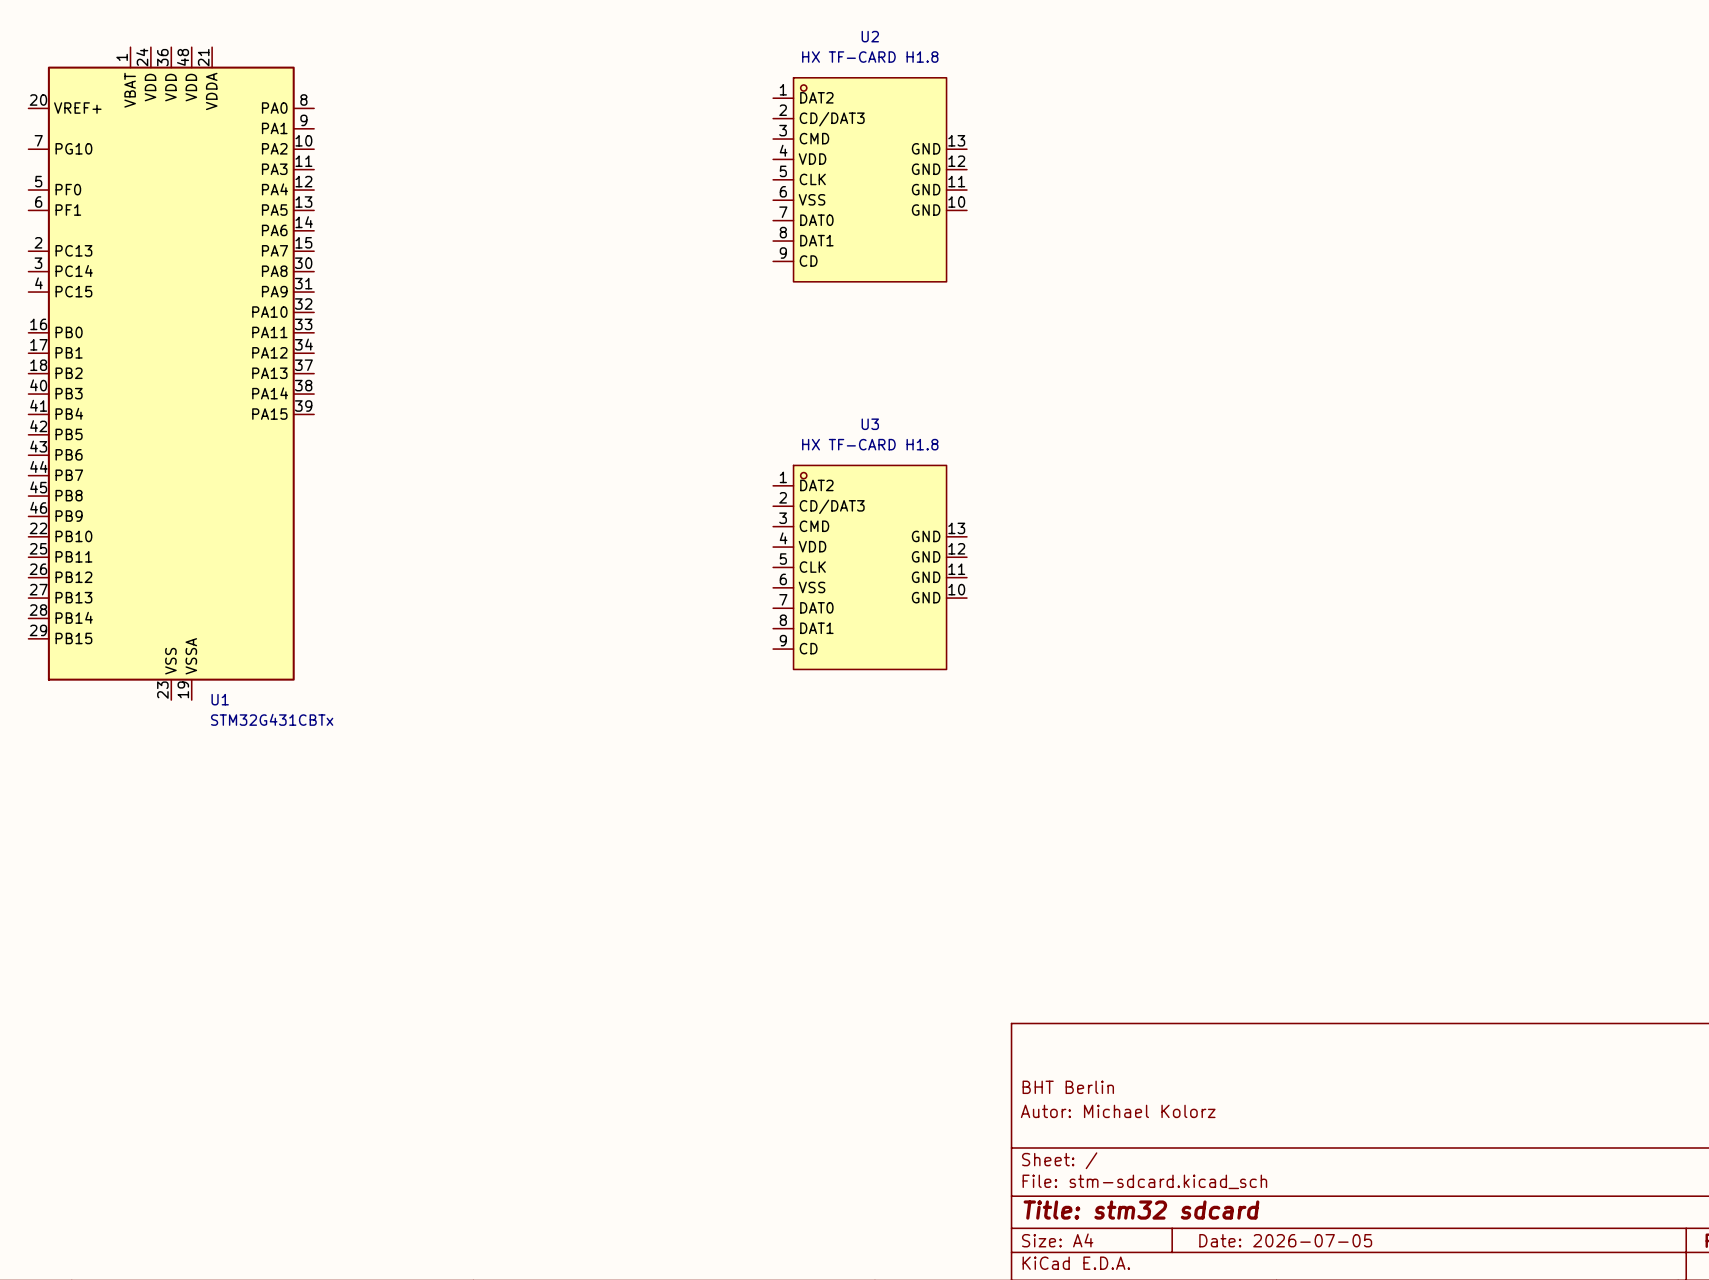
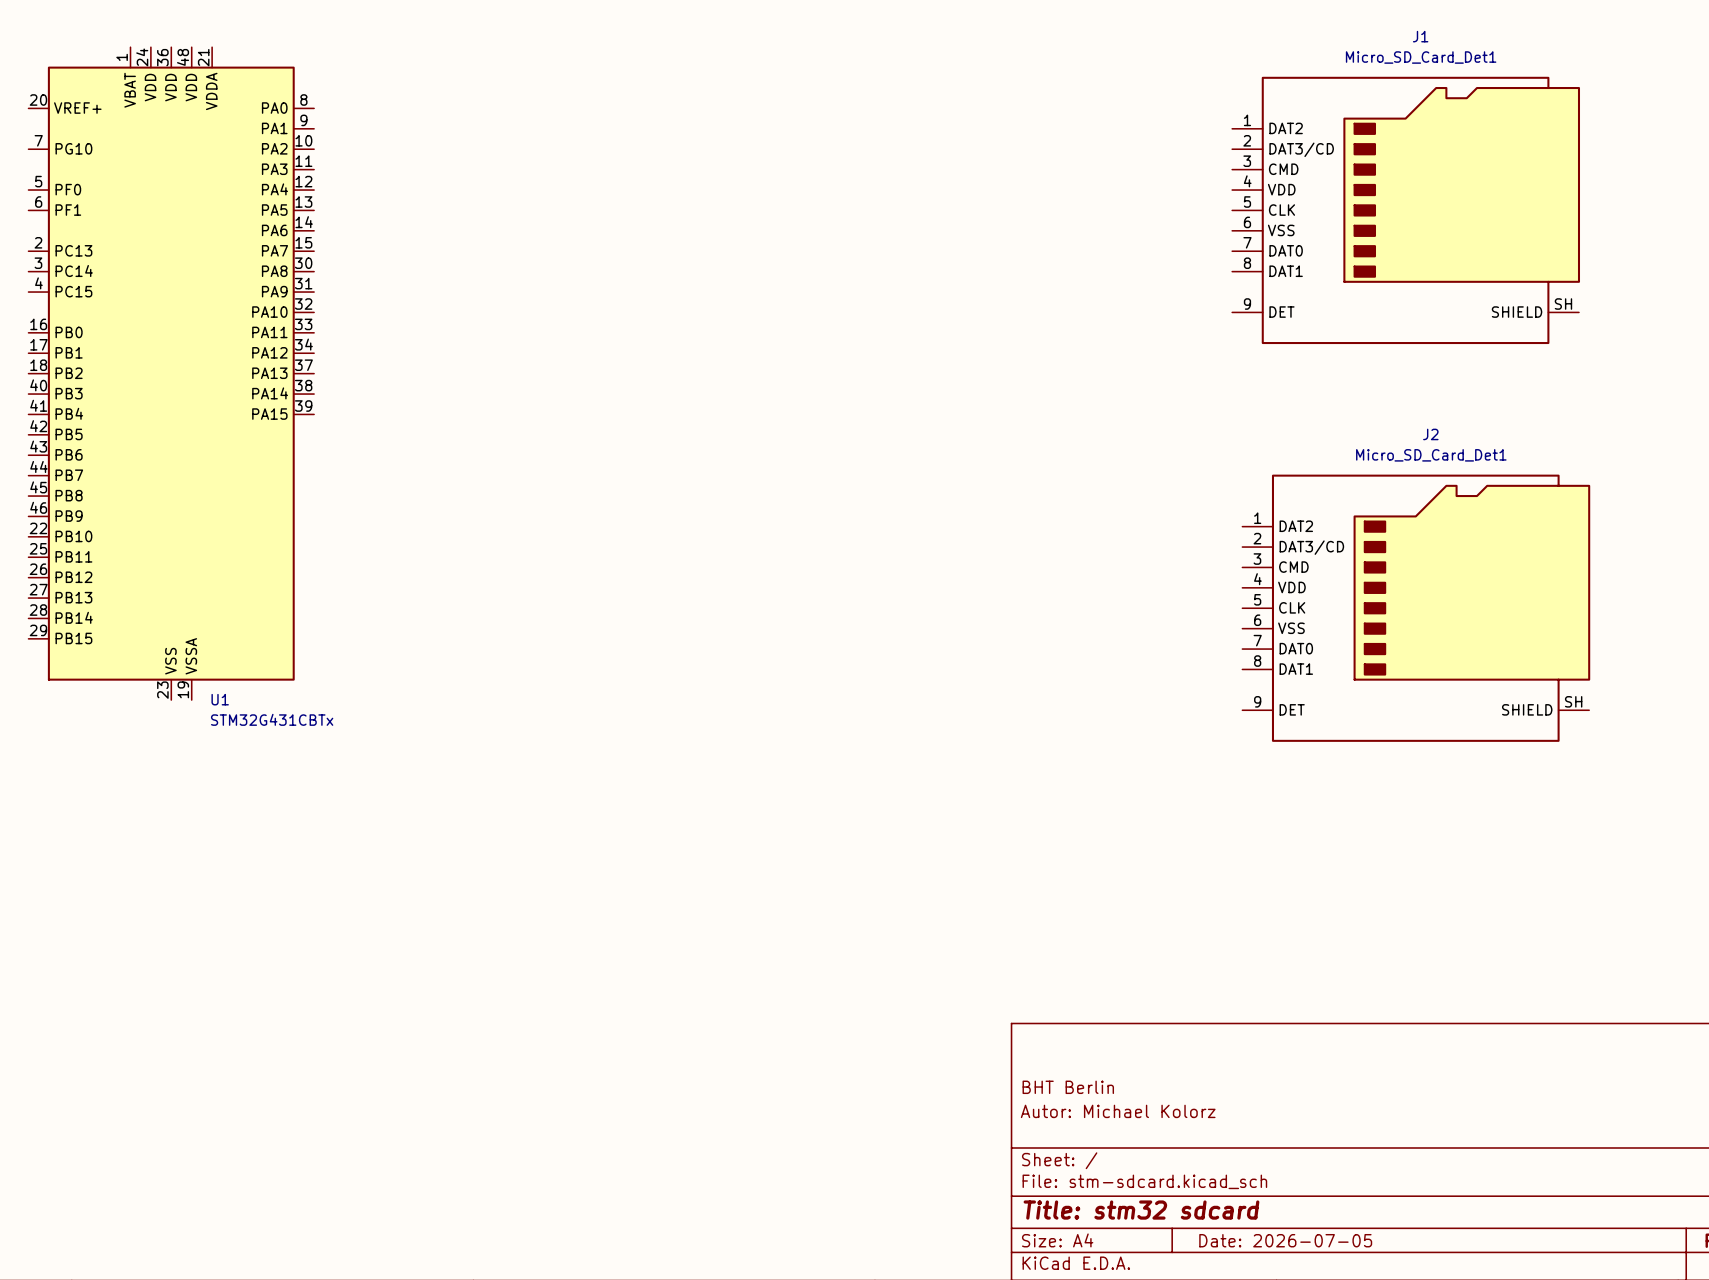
U2: HX TF-CARD H1.8 (870, 179) -> none
J1: none -> Micro_SD_Card_Det1 (1406, 210)
U3: HX TF-CARD H1.8 (870, 567) -> none
J2: none -> Micro_SD_Card_Det1 (1416, 608)

